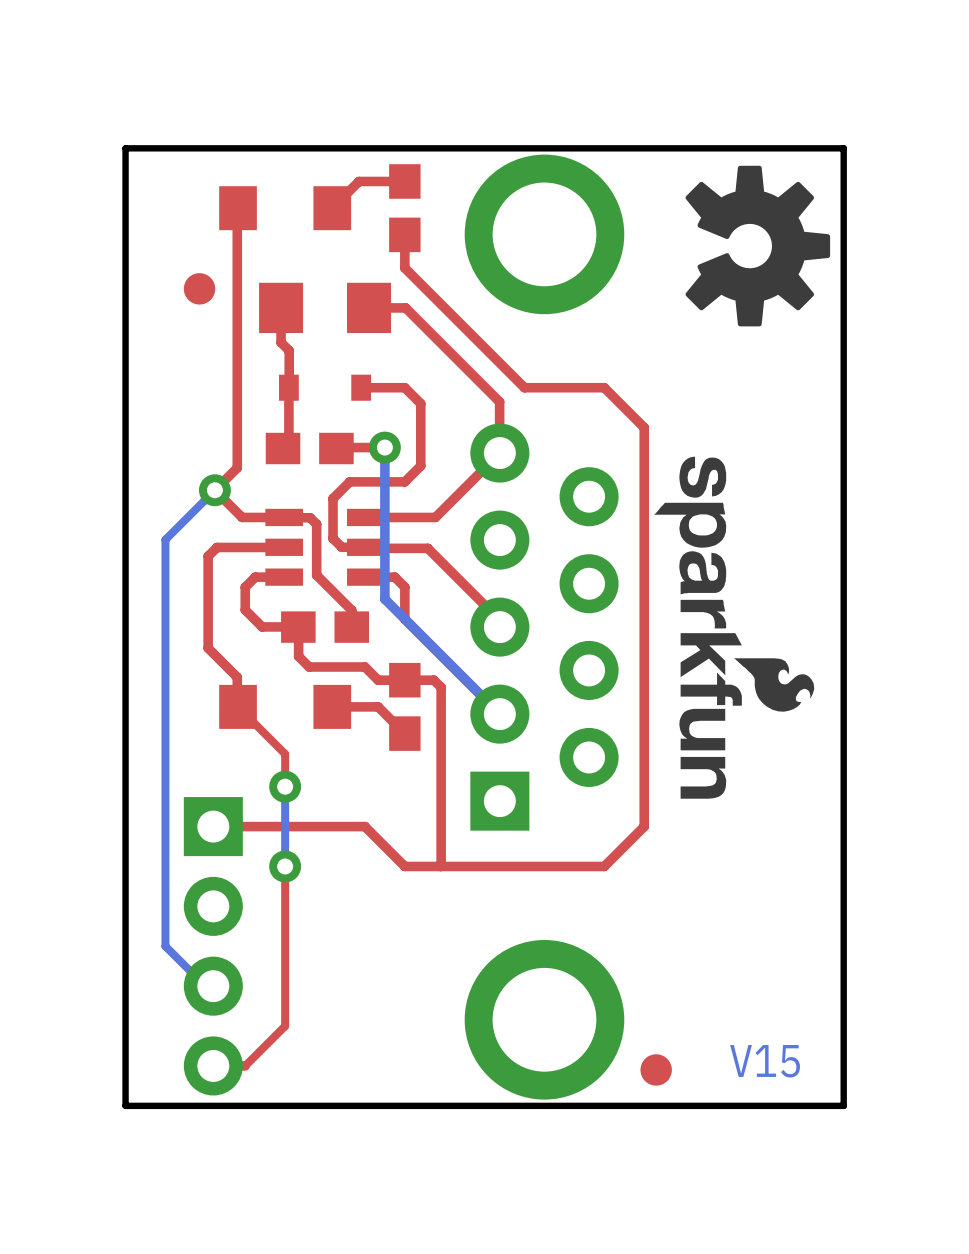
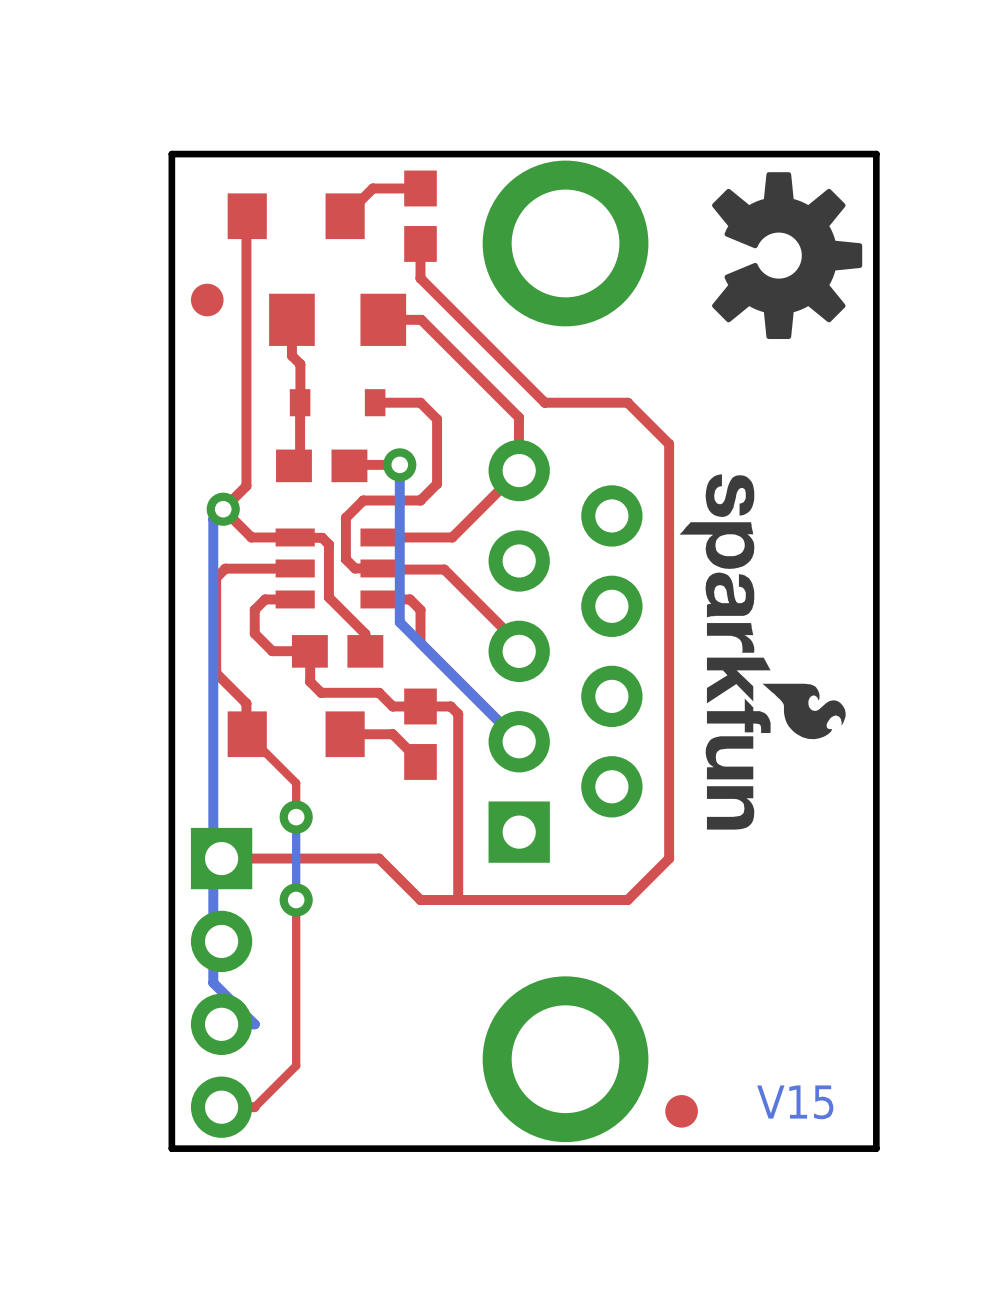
board edge: (165, 148) (125, 148) (125, 1105) (165, 1105) -> (171, 154) (171, 1148)
bottom track: (214, 490) (165, 539) (165, 946) (205, 986) (213, 986) -> (213, 519) (213, 982) (254, 1024) (221, 1024)

